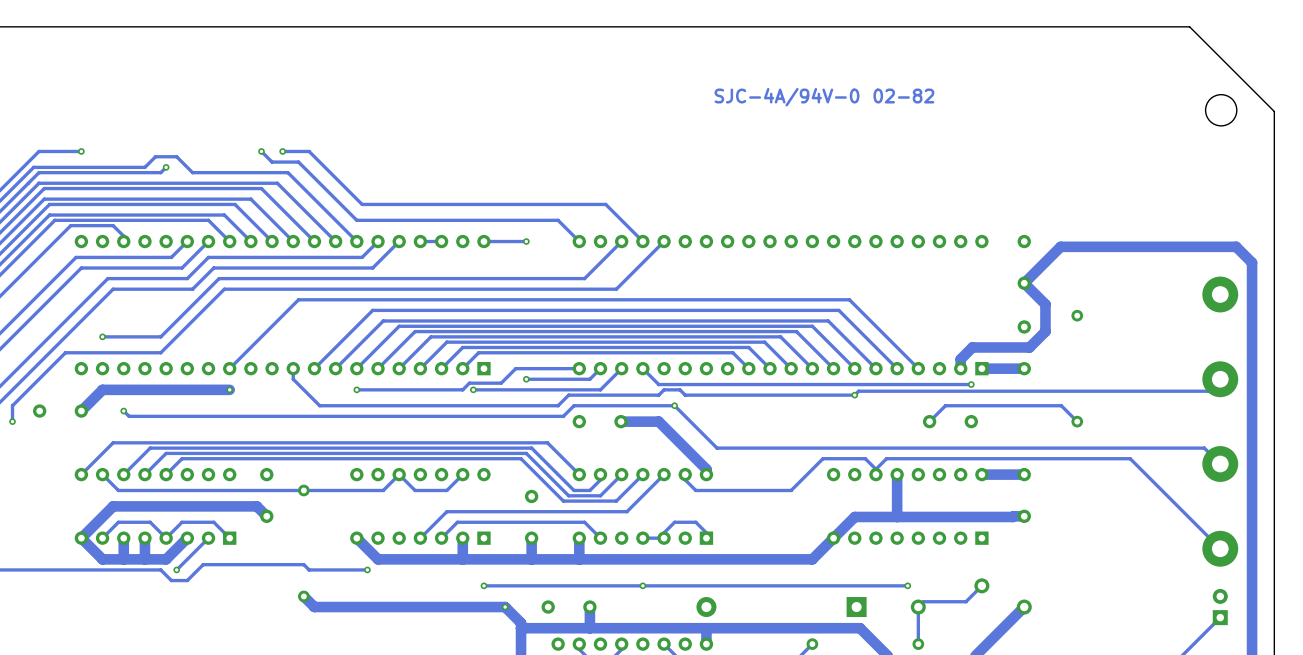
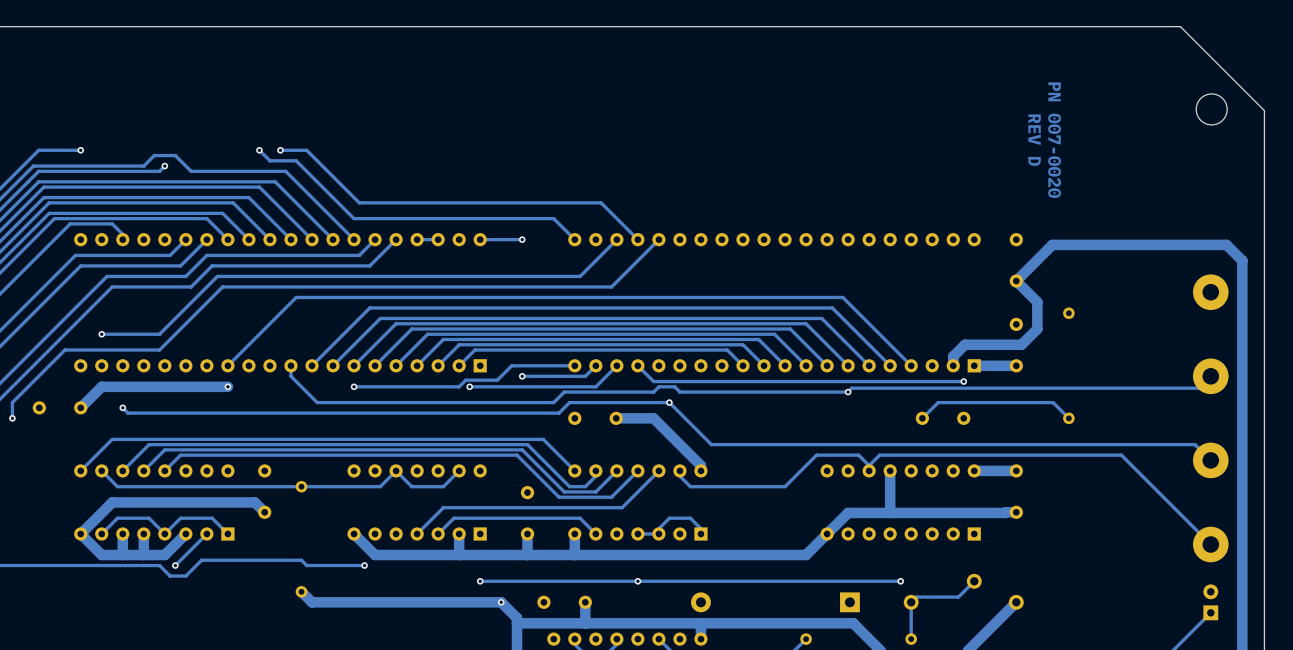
text: 02-82 (903, 96) -> none
text: SJC-4A/94V-0 (786, 97) -> none
text: none -> REV D (1034, 140)
text: none -> PN 007-0020 (1054, 140)

